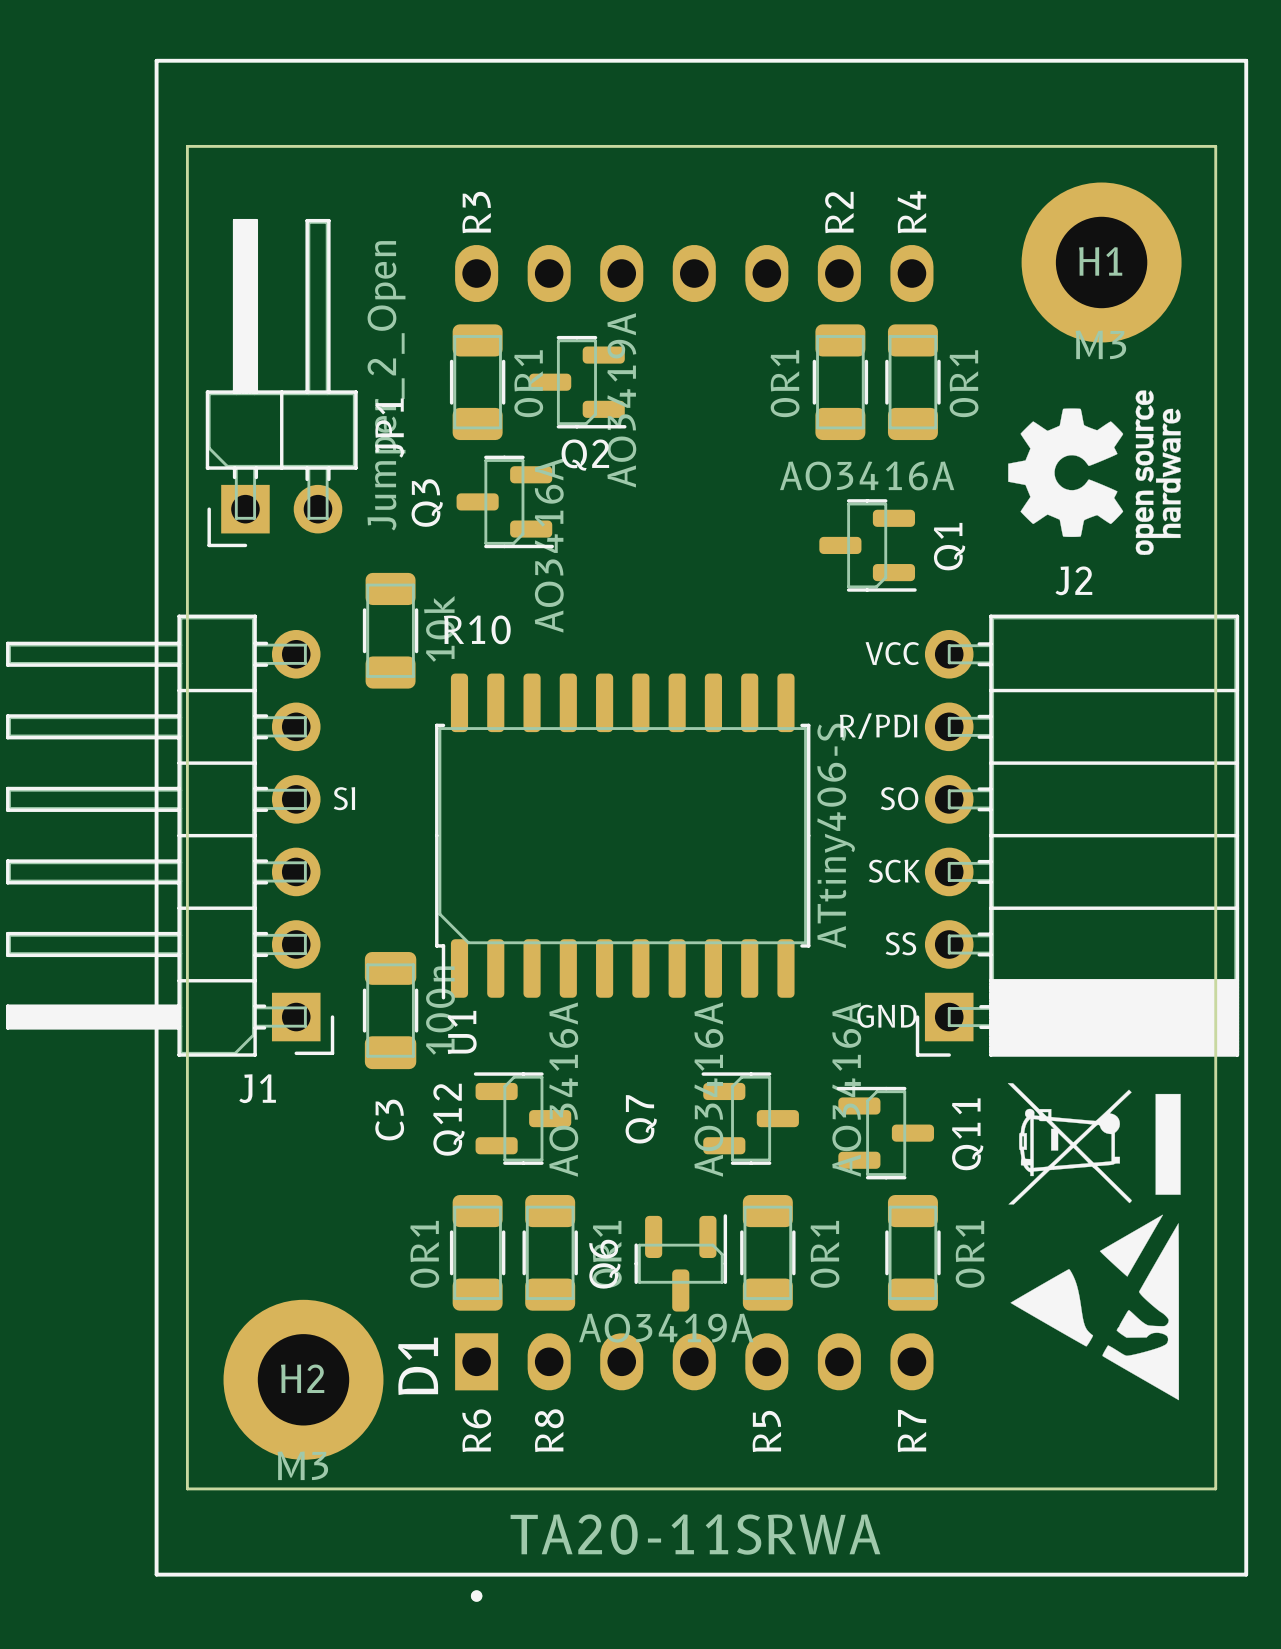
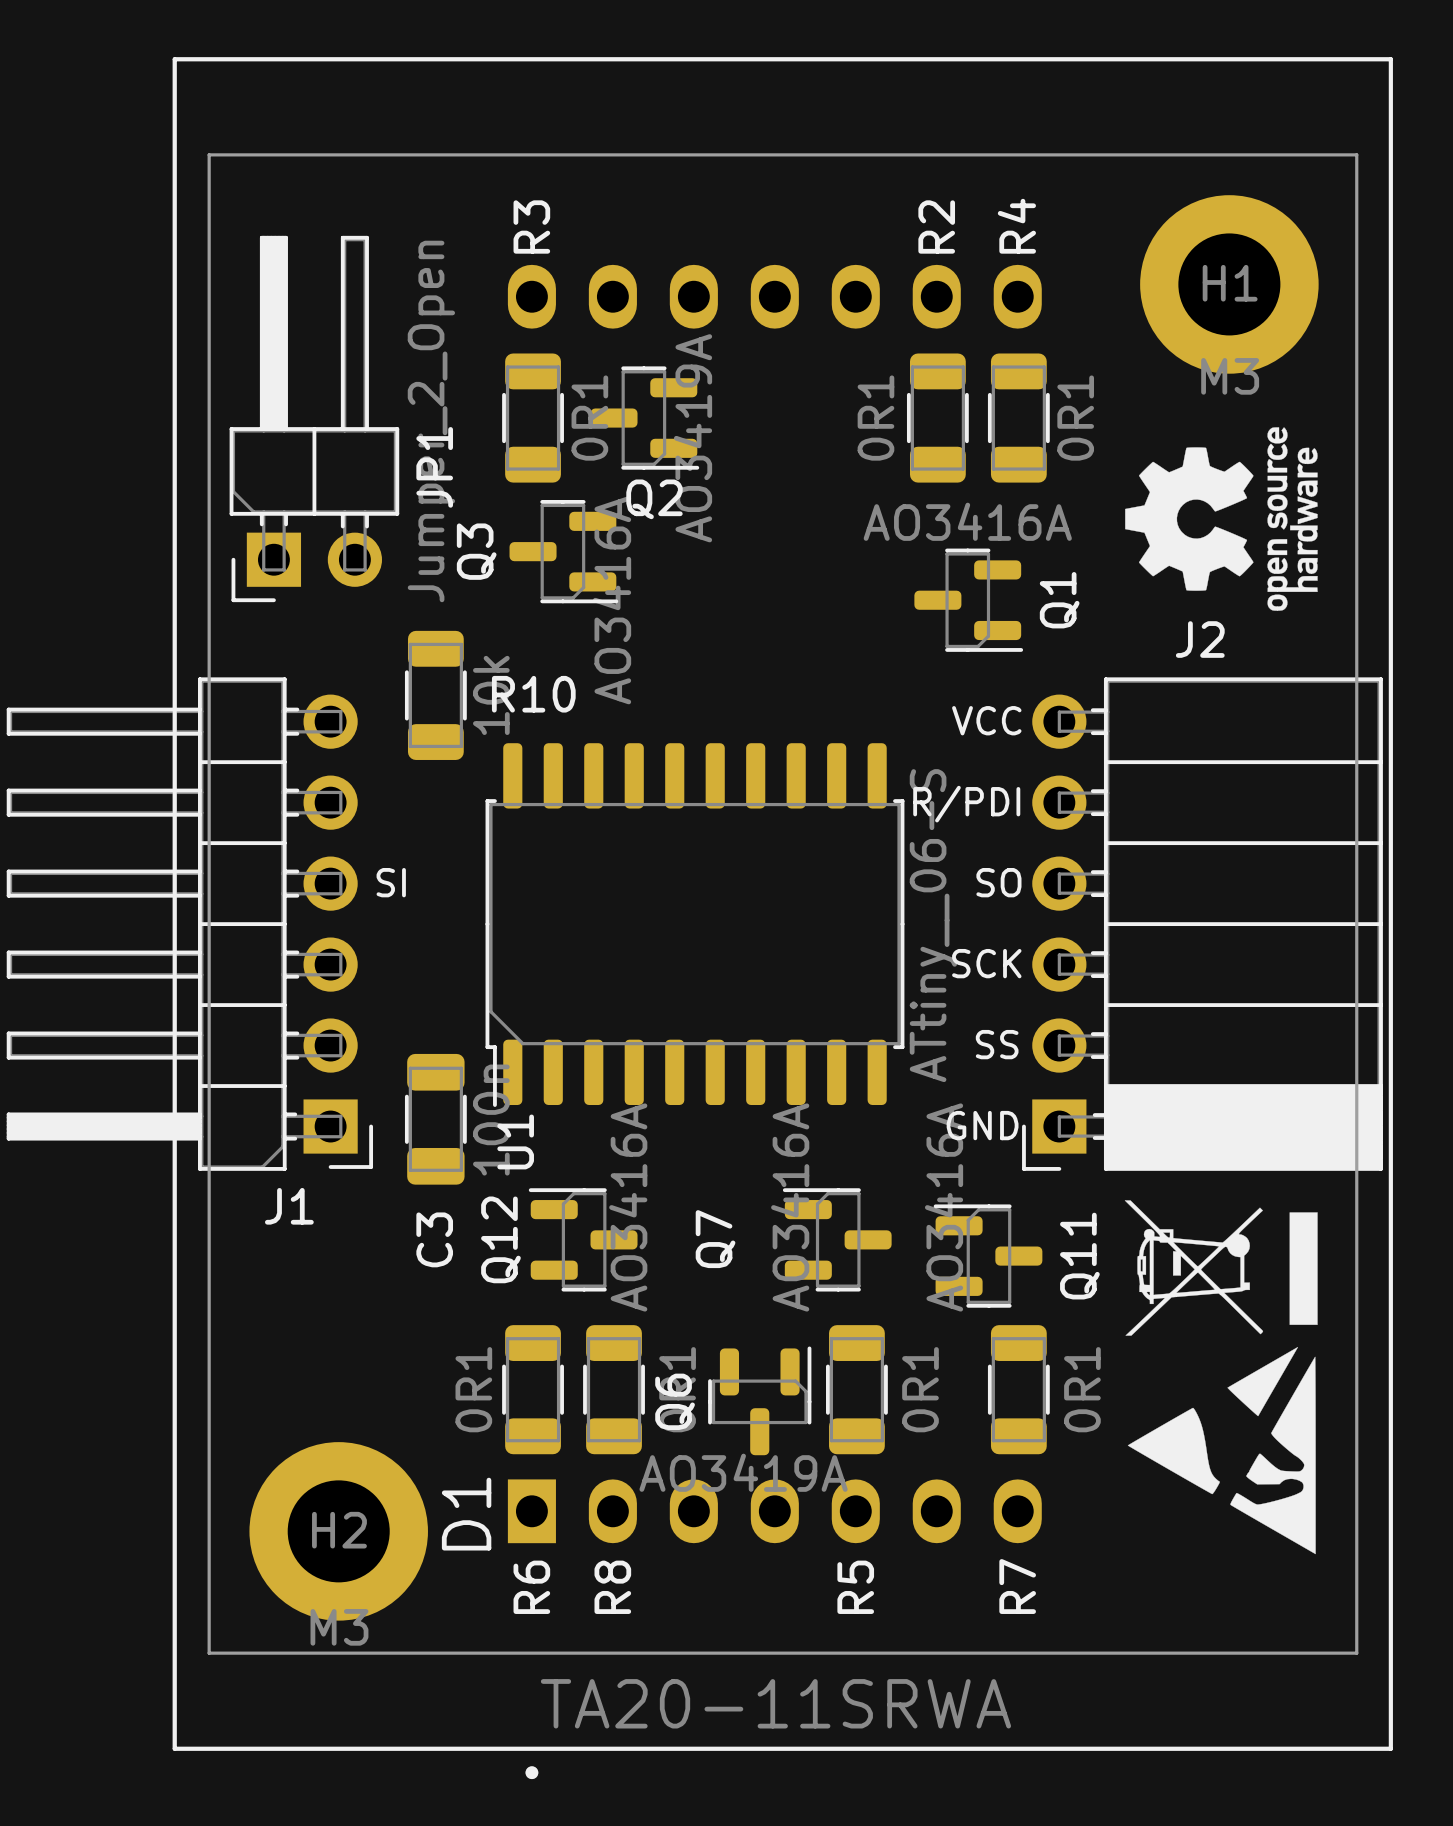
U1 value: ATtiny406-S (836, 835) -> ATtiny__06-S (933, 925)

